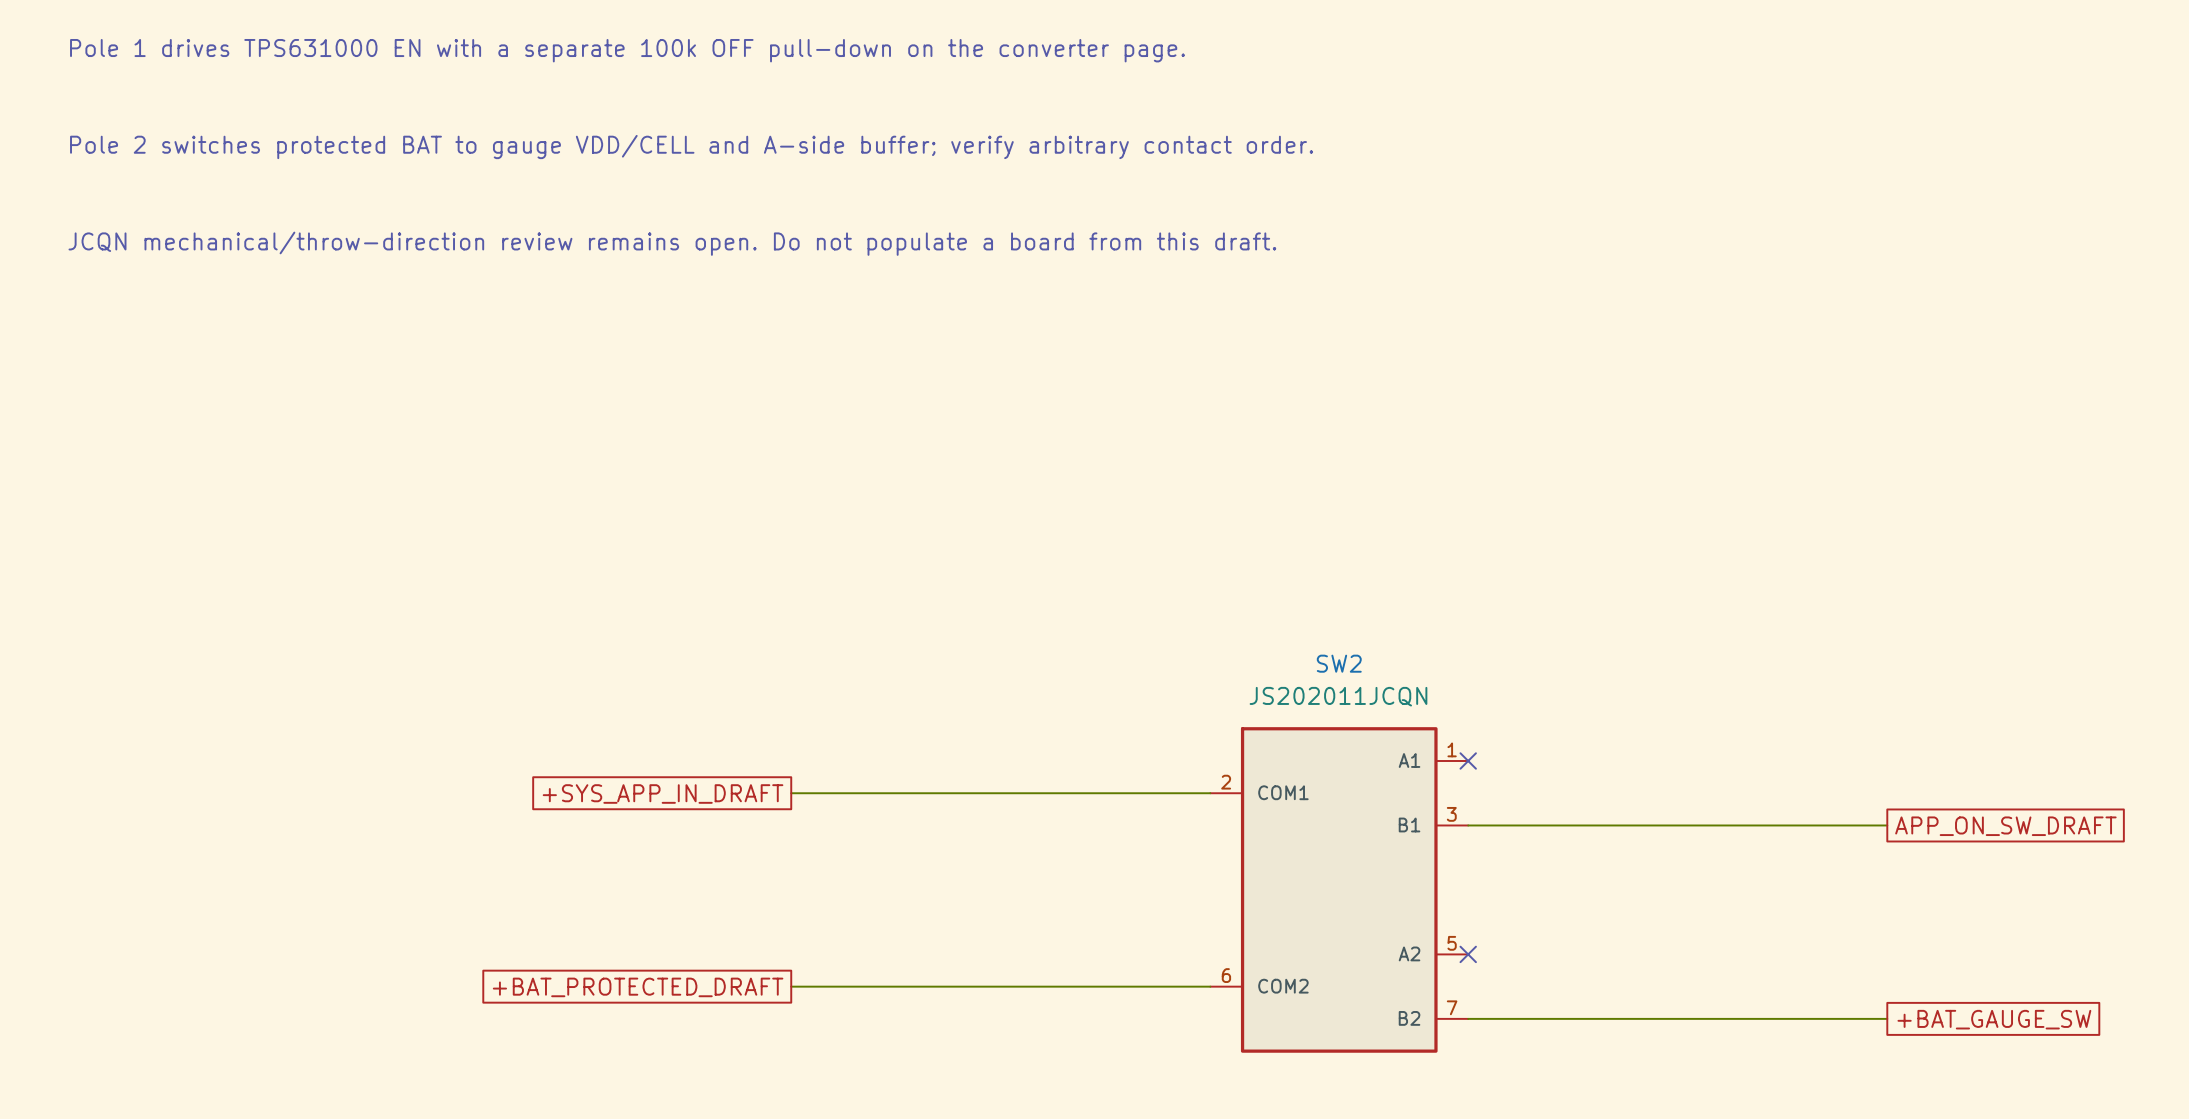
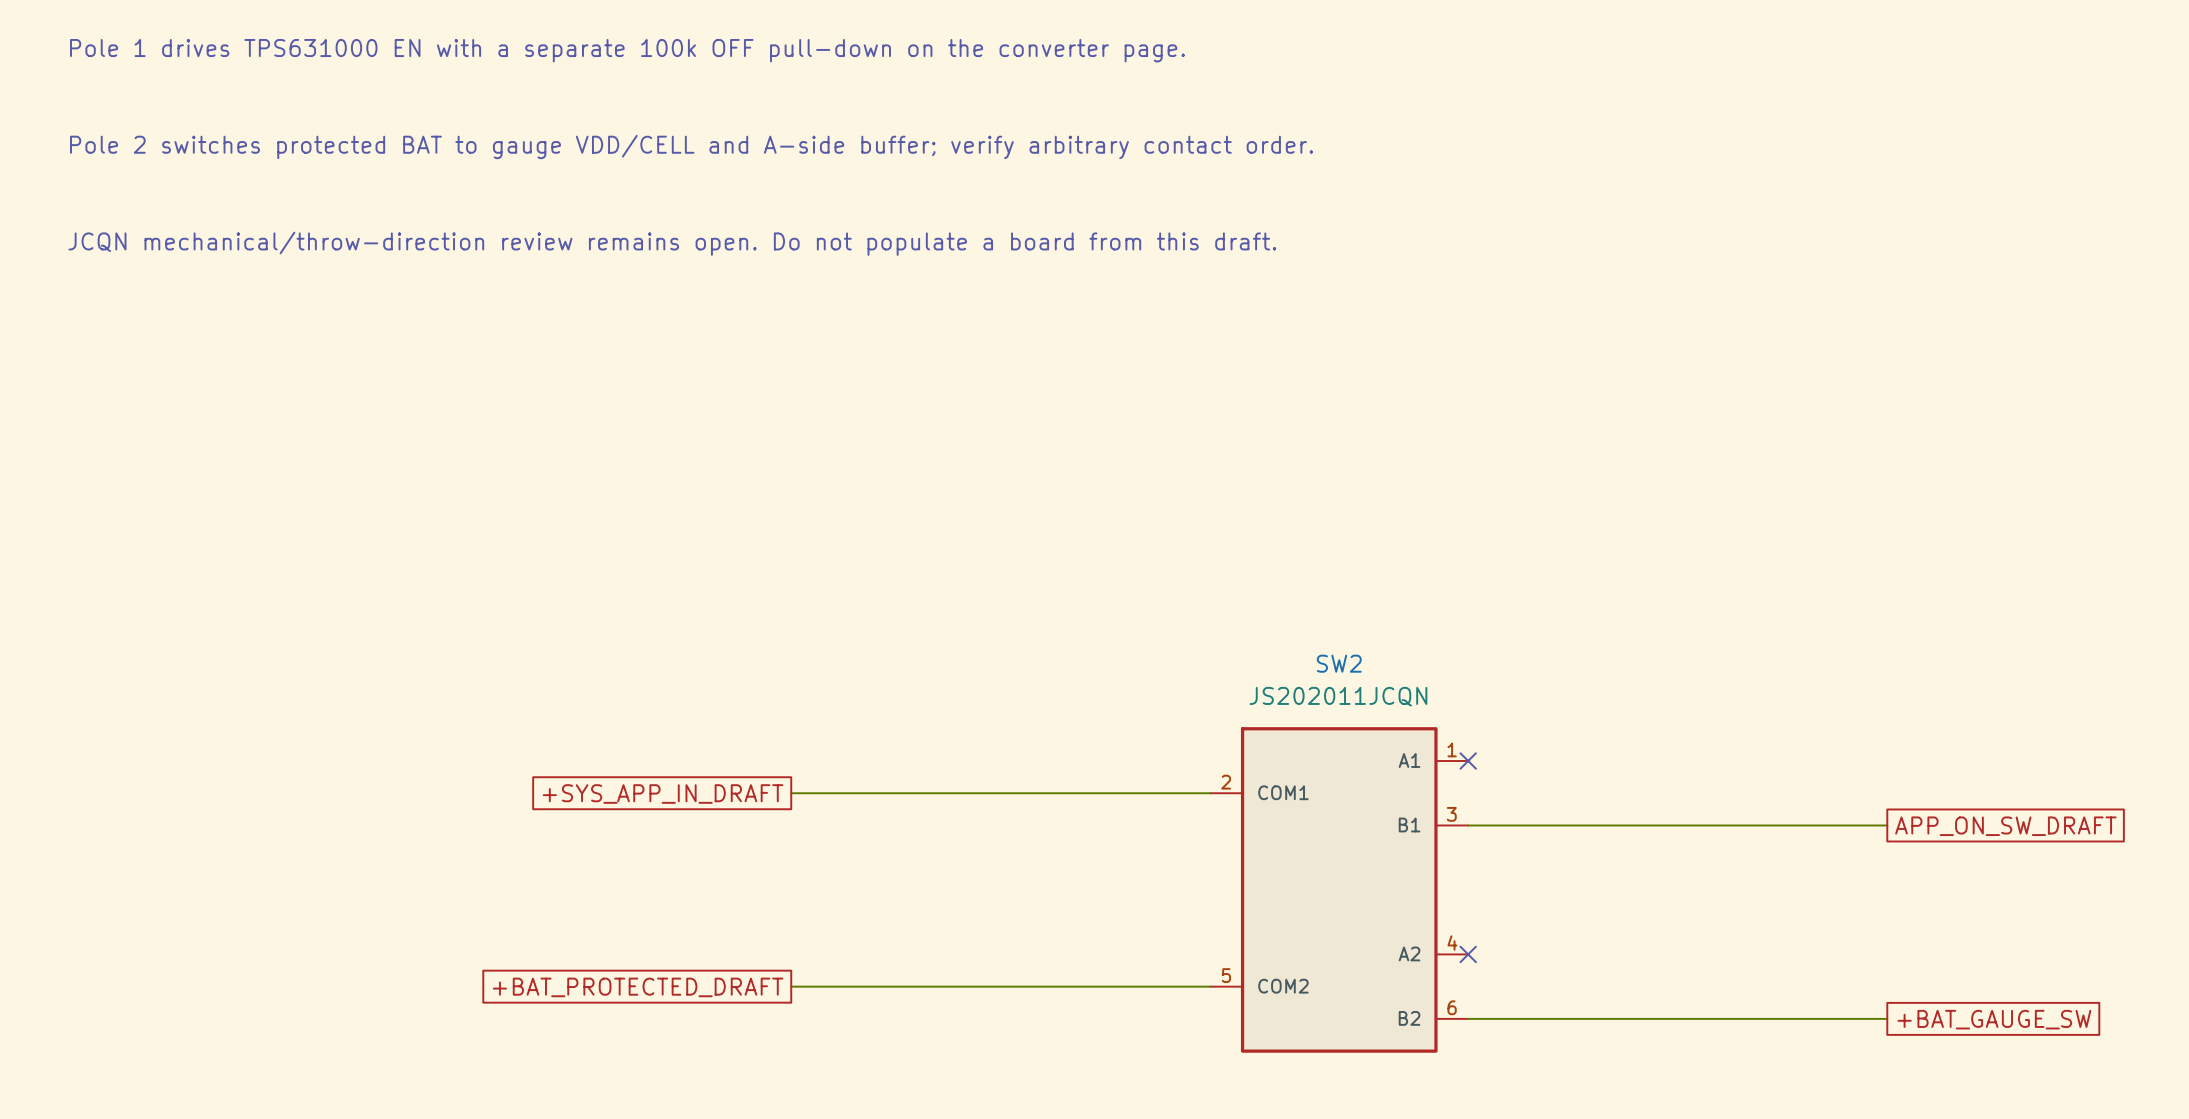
SW2 pin number: 5 (1452, 943) -> 4 (1452, 943)
SW2 pin number: 6 (1226, 975) -> 5 (1226, 975)
SW2 pin number: 7 (1452, 1007) -> 6 (1452, 1007)

